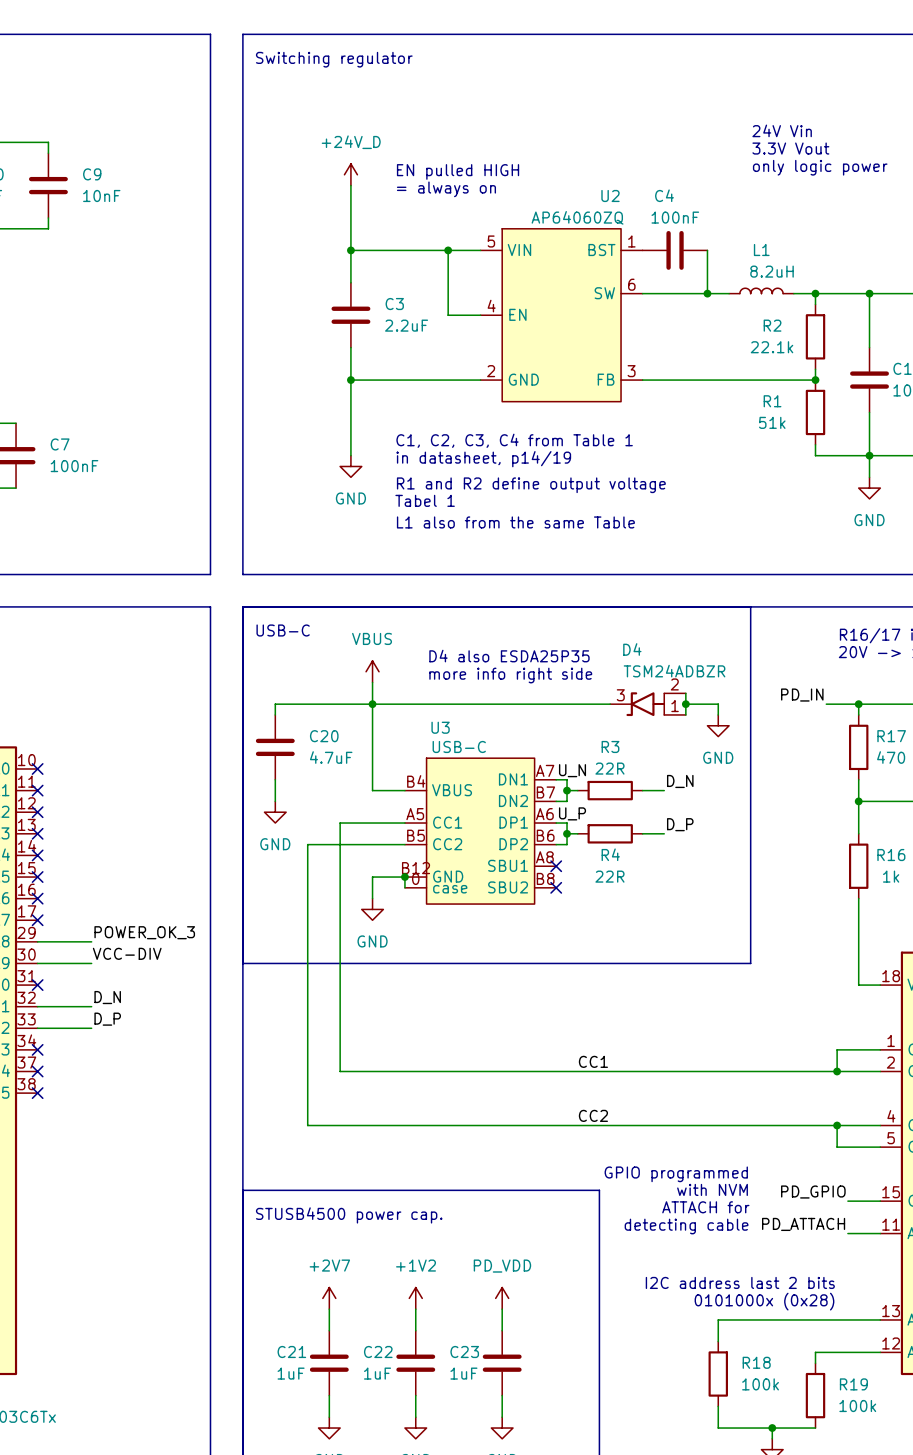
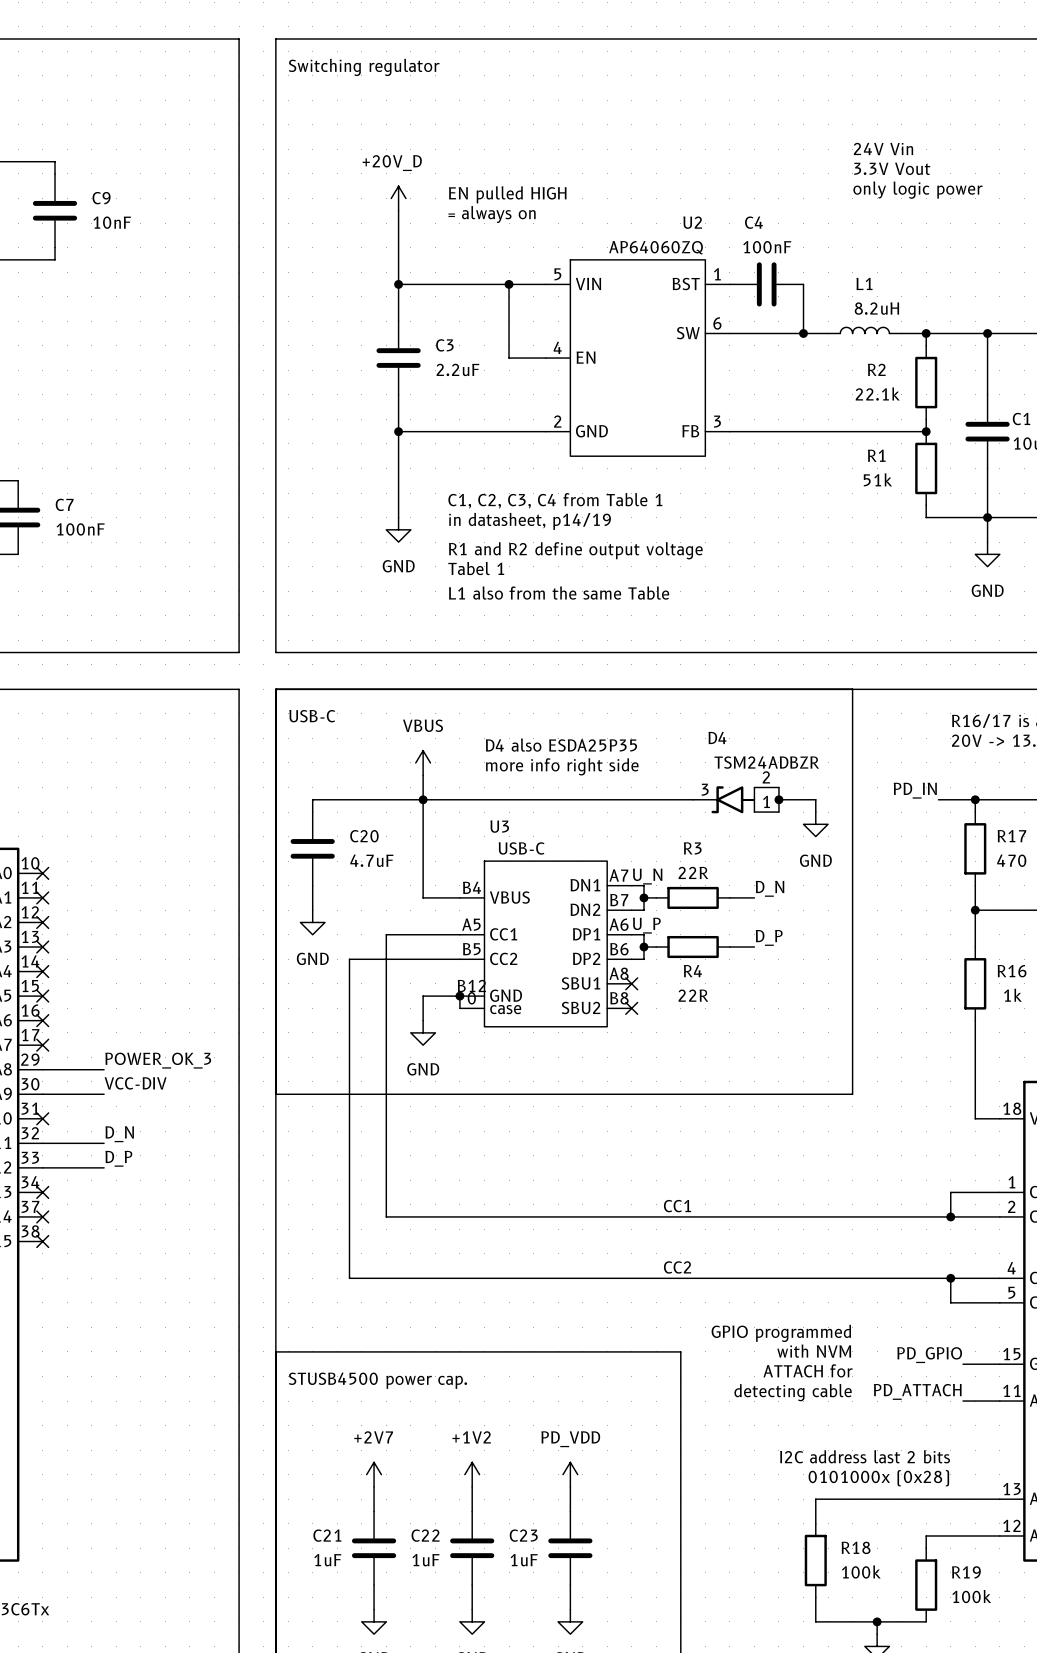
power symbol: +24V_D (350, 174) -> +20V_D (398, 198)

